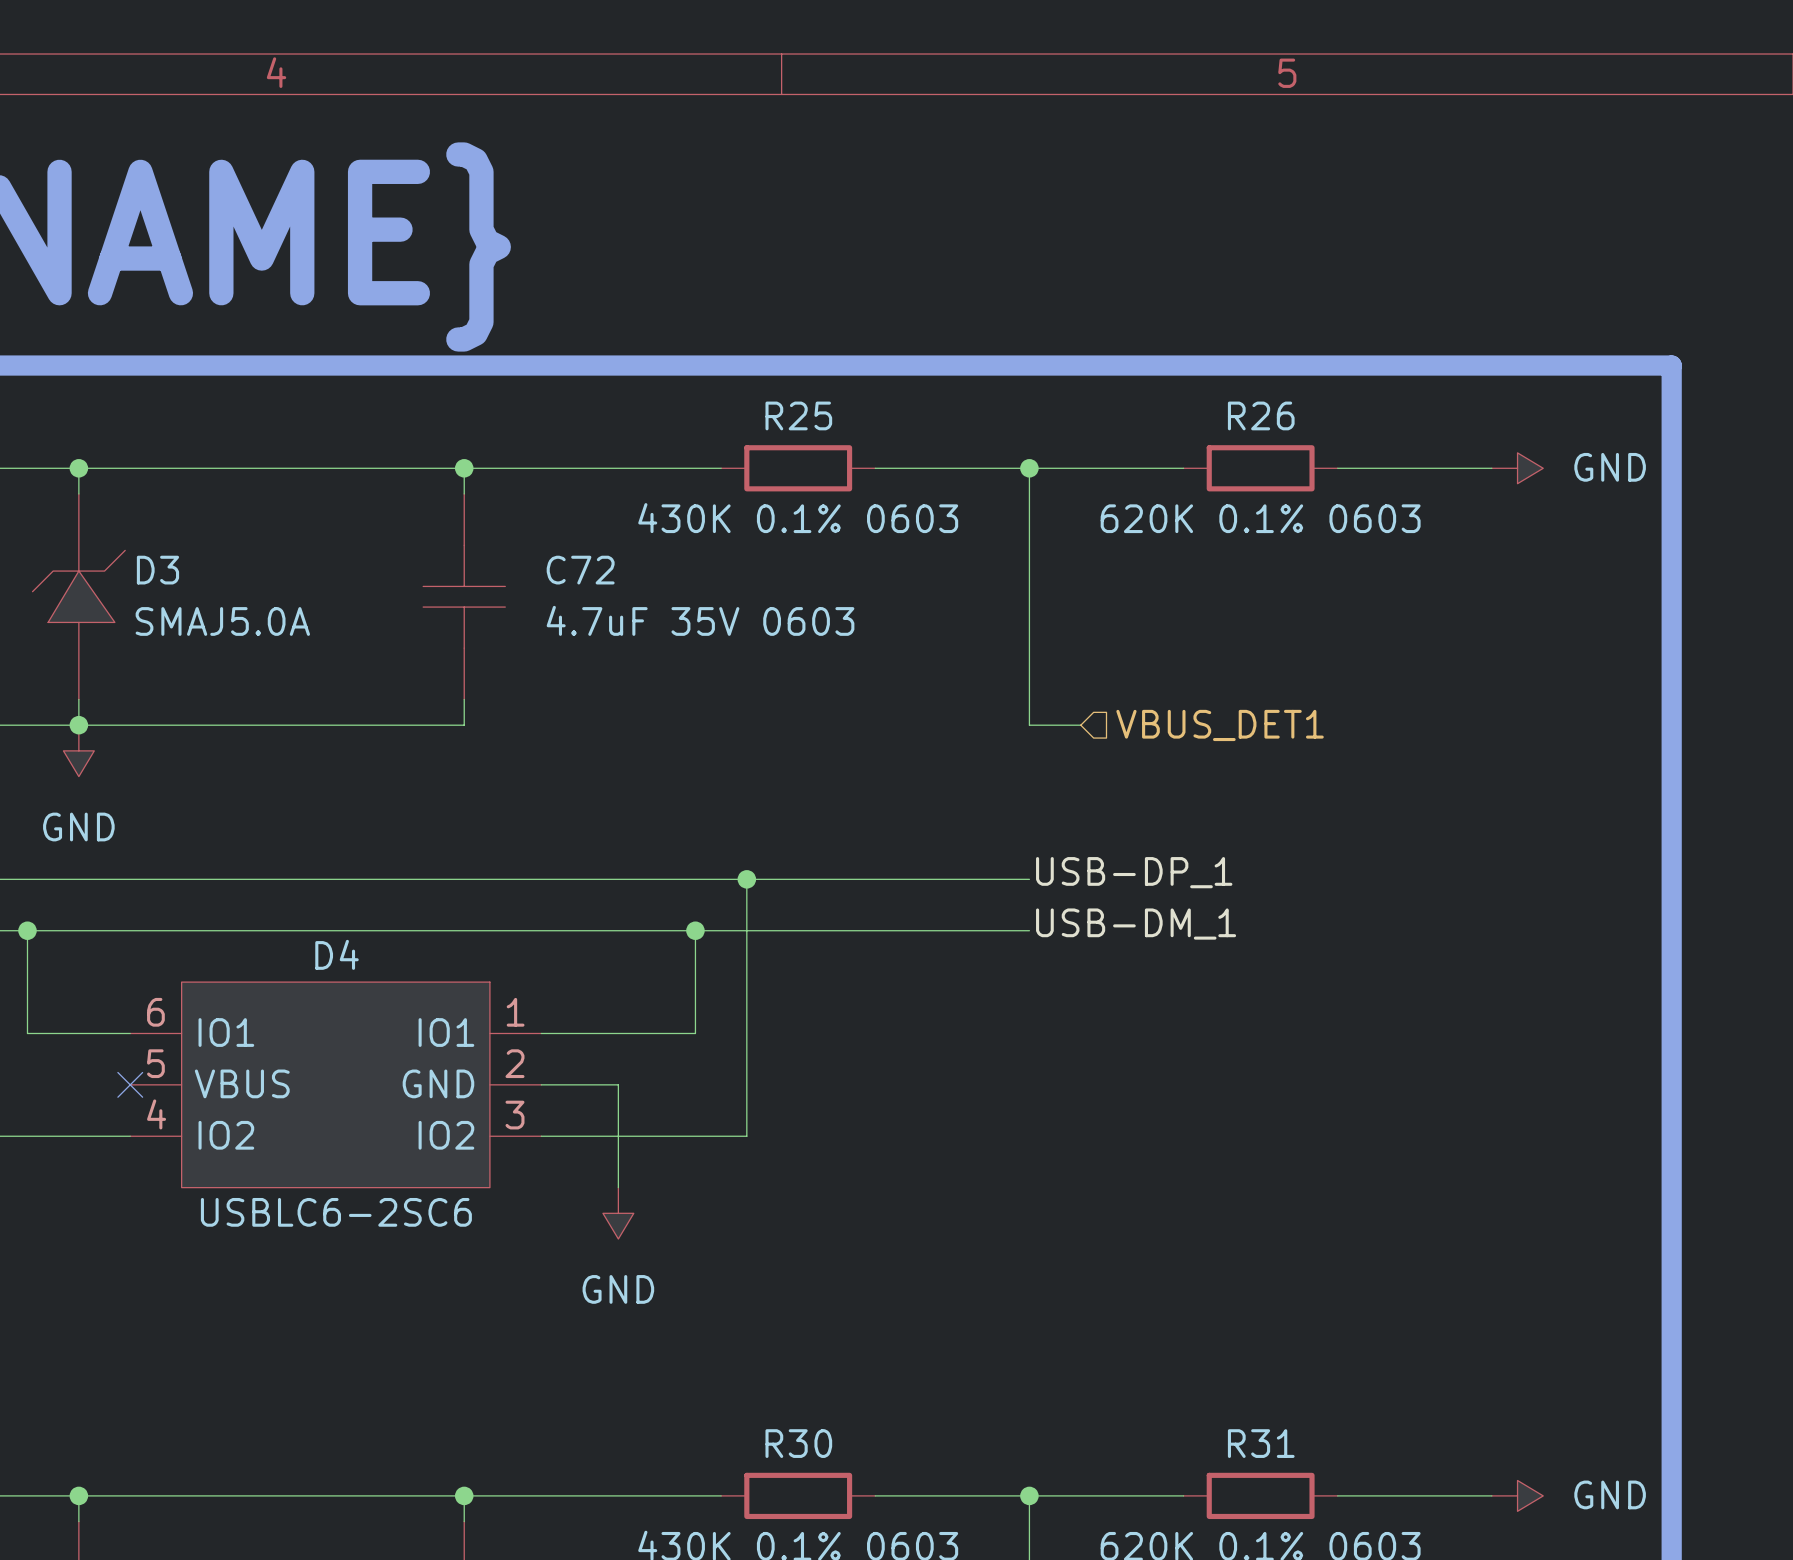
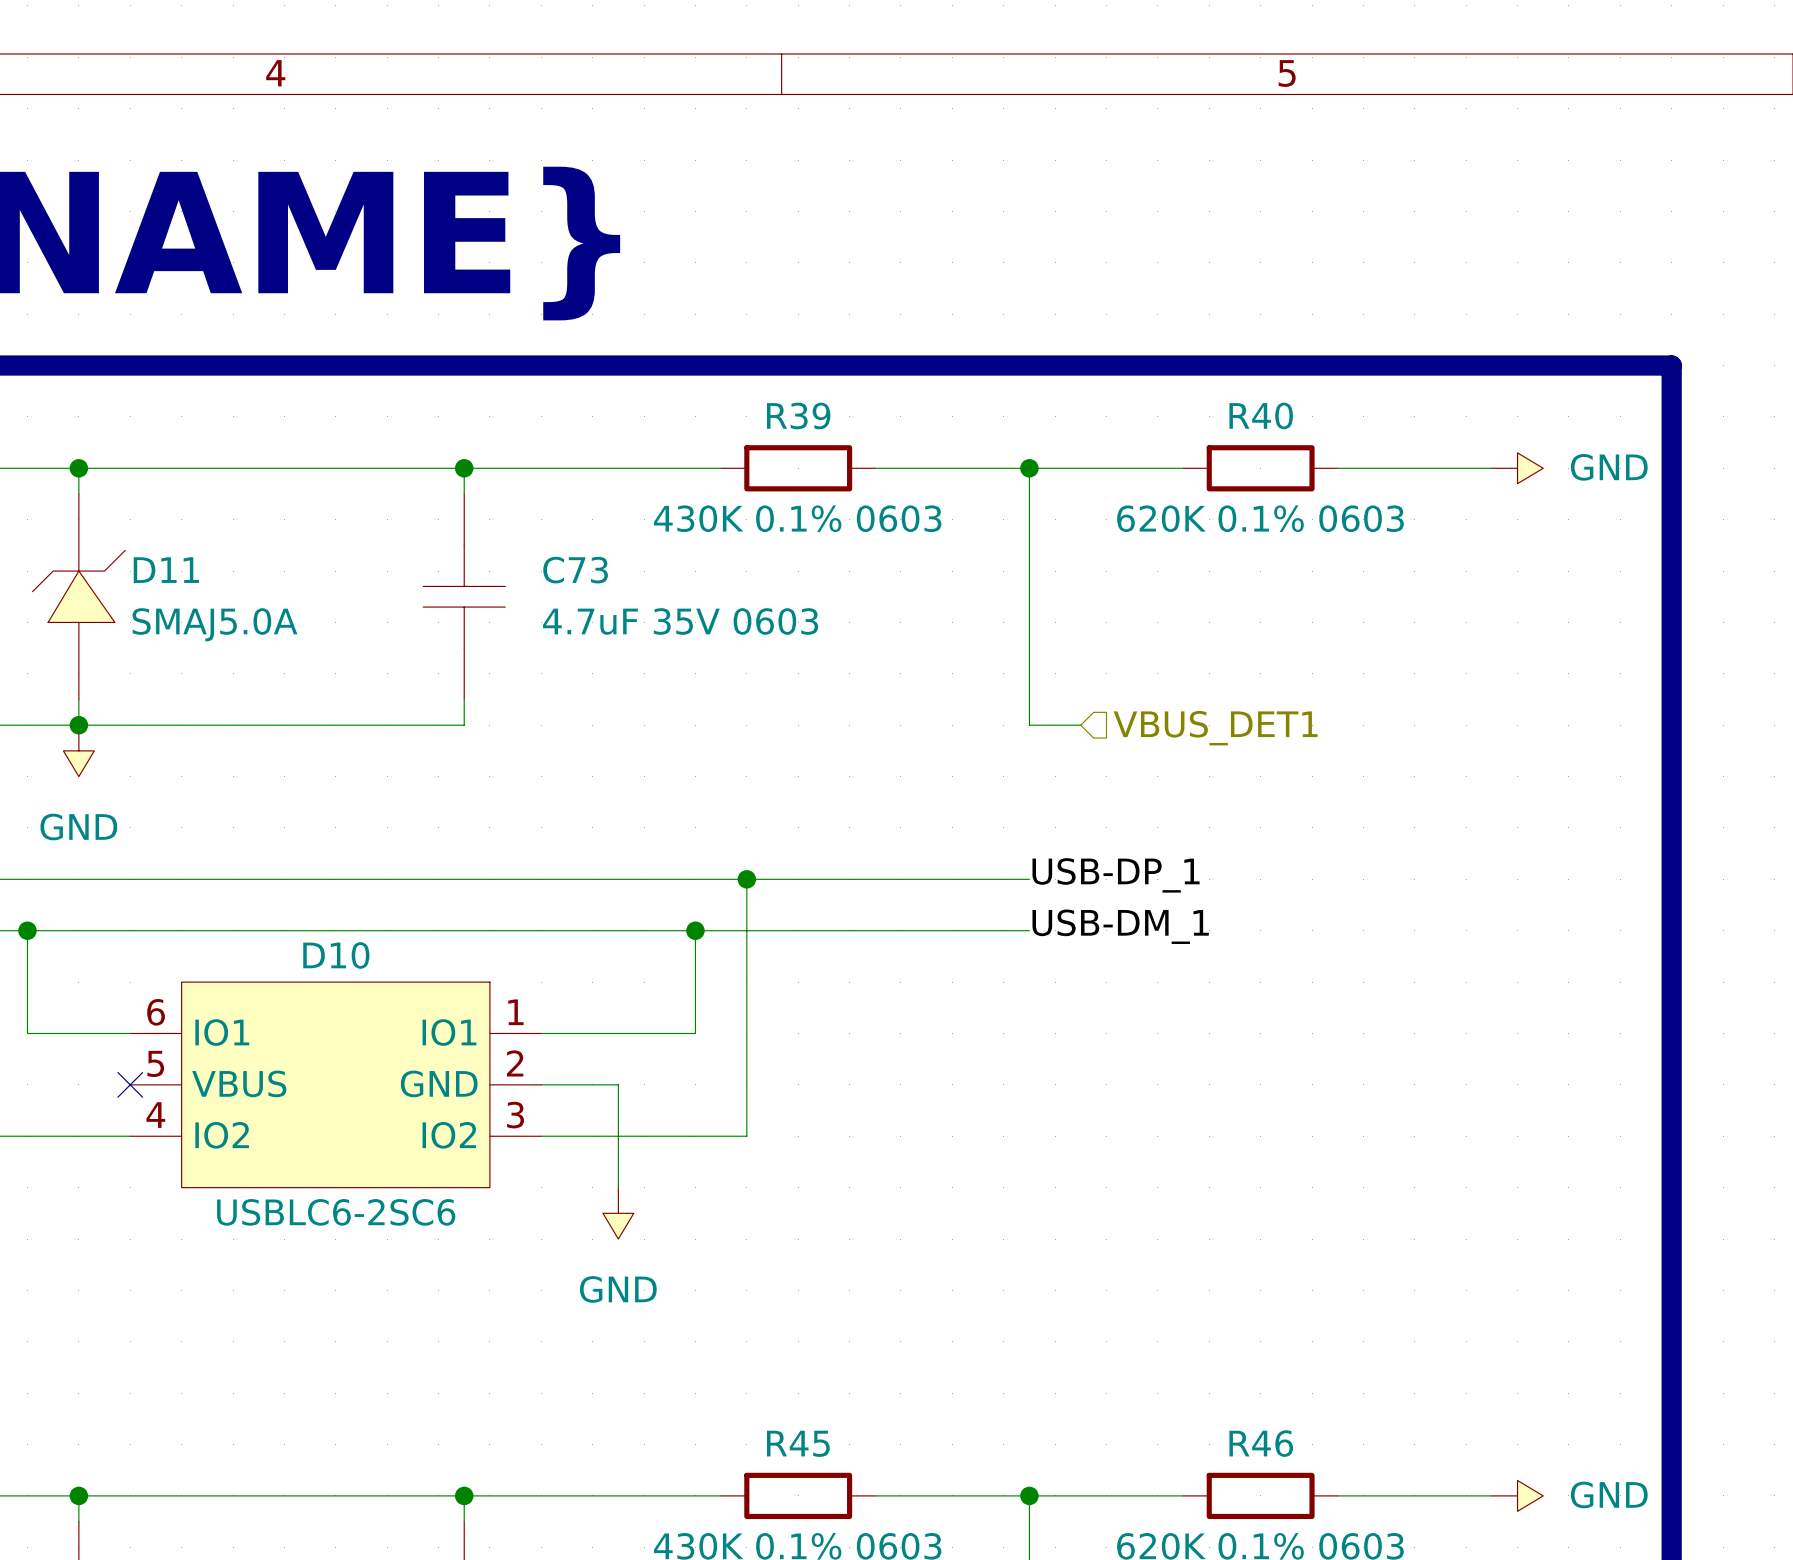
R25 name: R25 (798, 415) -> R39 (798, 415)
R26 name: R26 (1261, 415) -> R40 (1261, 415)
D3 name: D3 (157, 570) -> D11 (166, 570)
C72 name: C72 (580, 570) -> C73 (575, 570)
D4 name: D4 (337, 954) -> D10 (336, 955)
R30 name: R30 (798, 1443) -> R45 (798, 1443)
R31 name: R31 (1261, 1443) -> R46 (1261, 1443)

